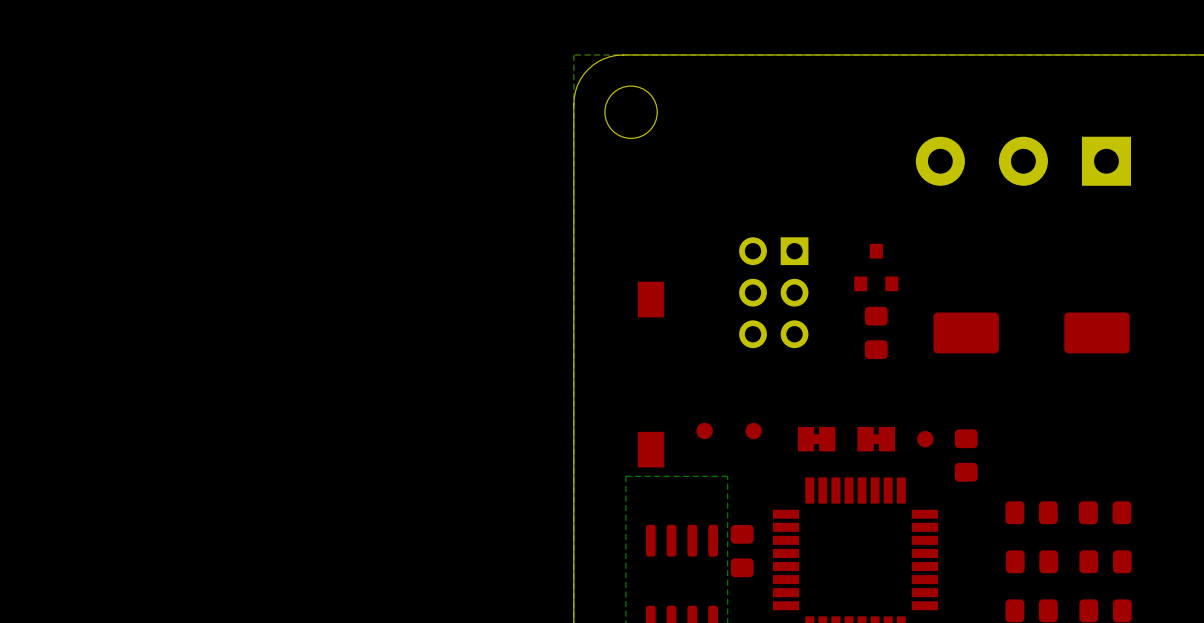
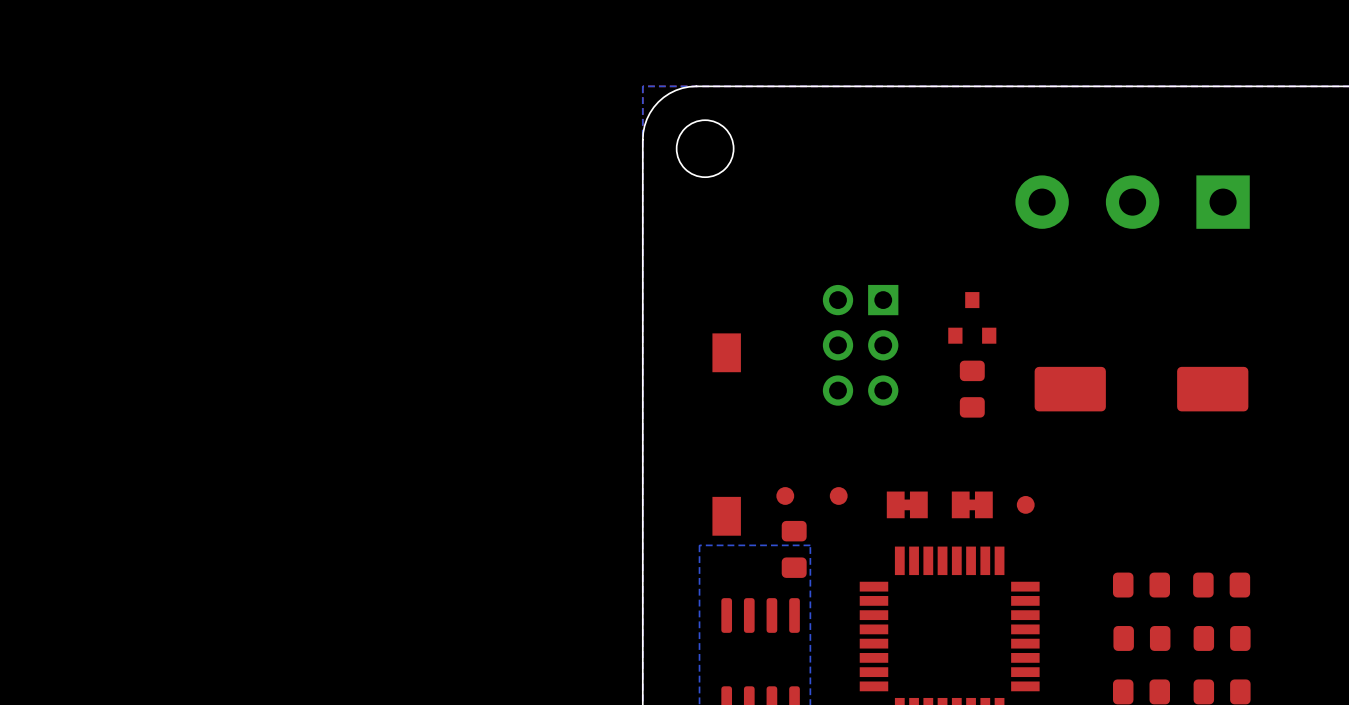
part: (966, 455) -> none
part position: (742, 551) -> (794, 549)

